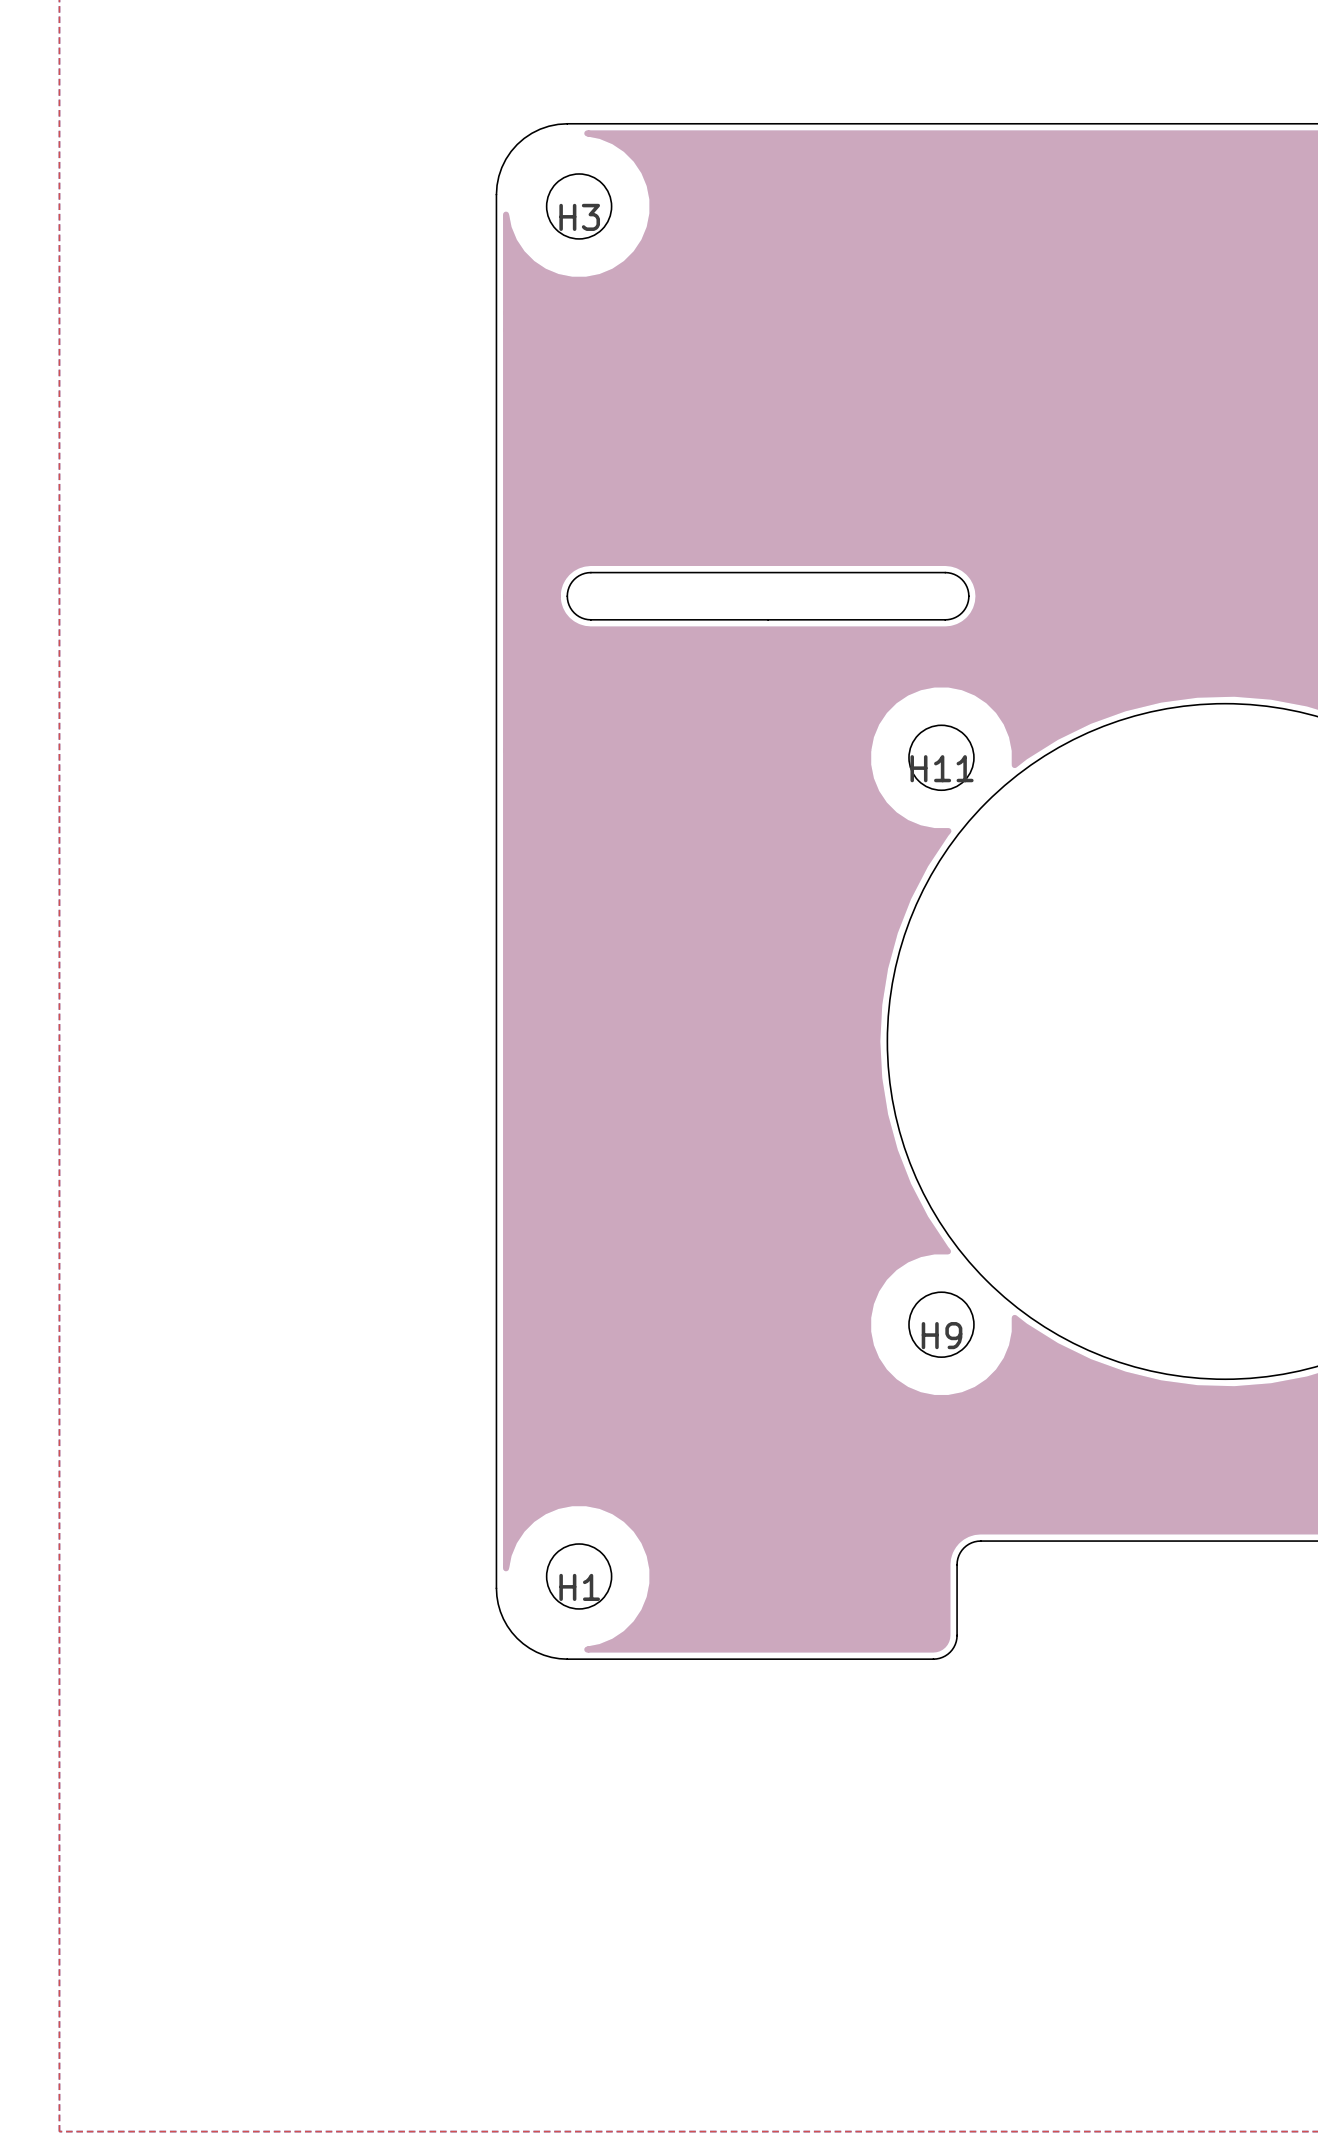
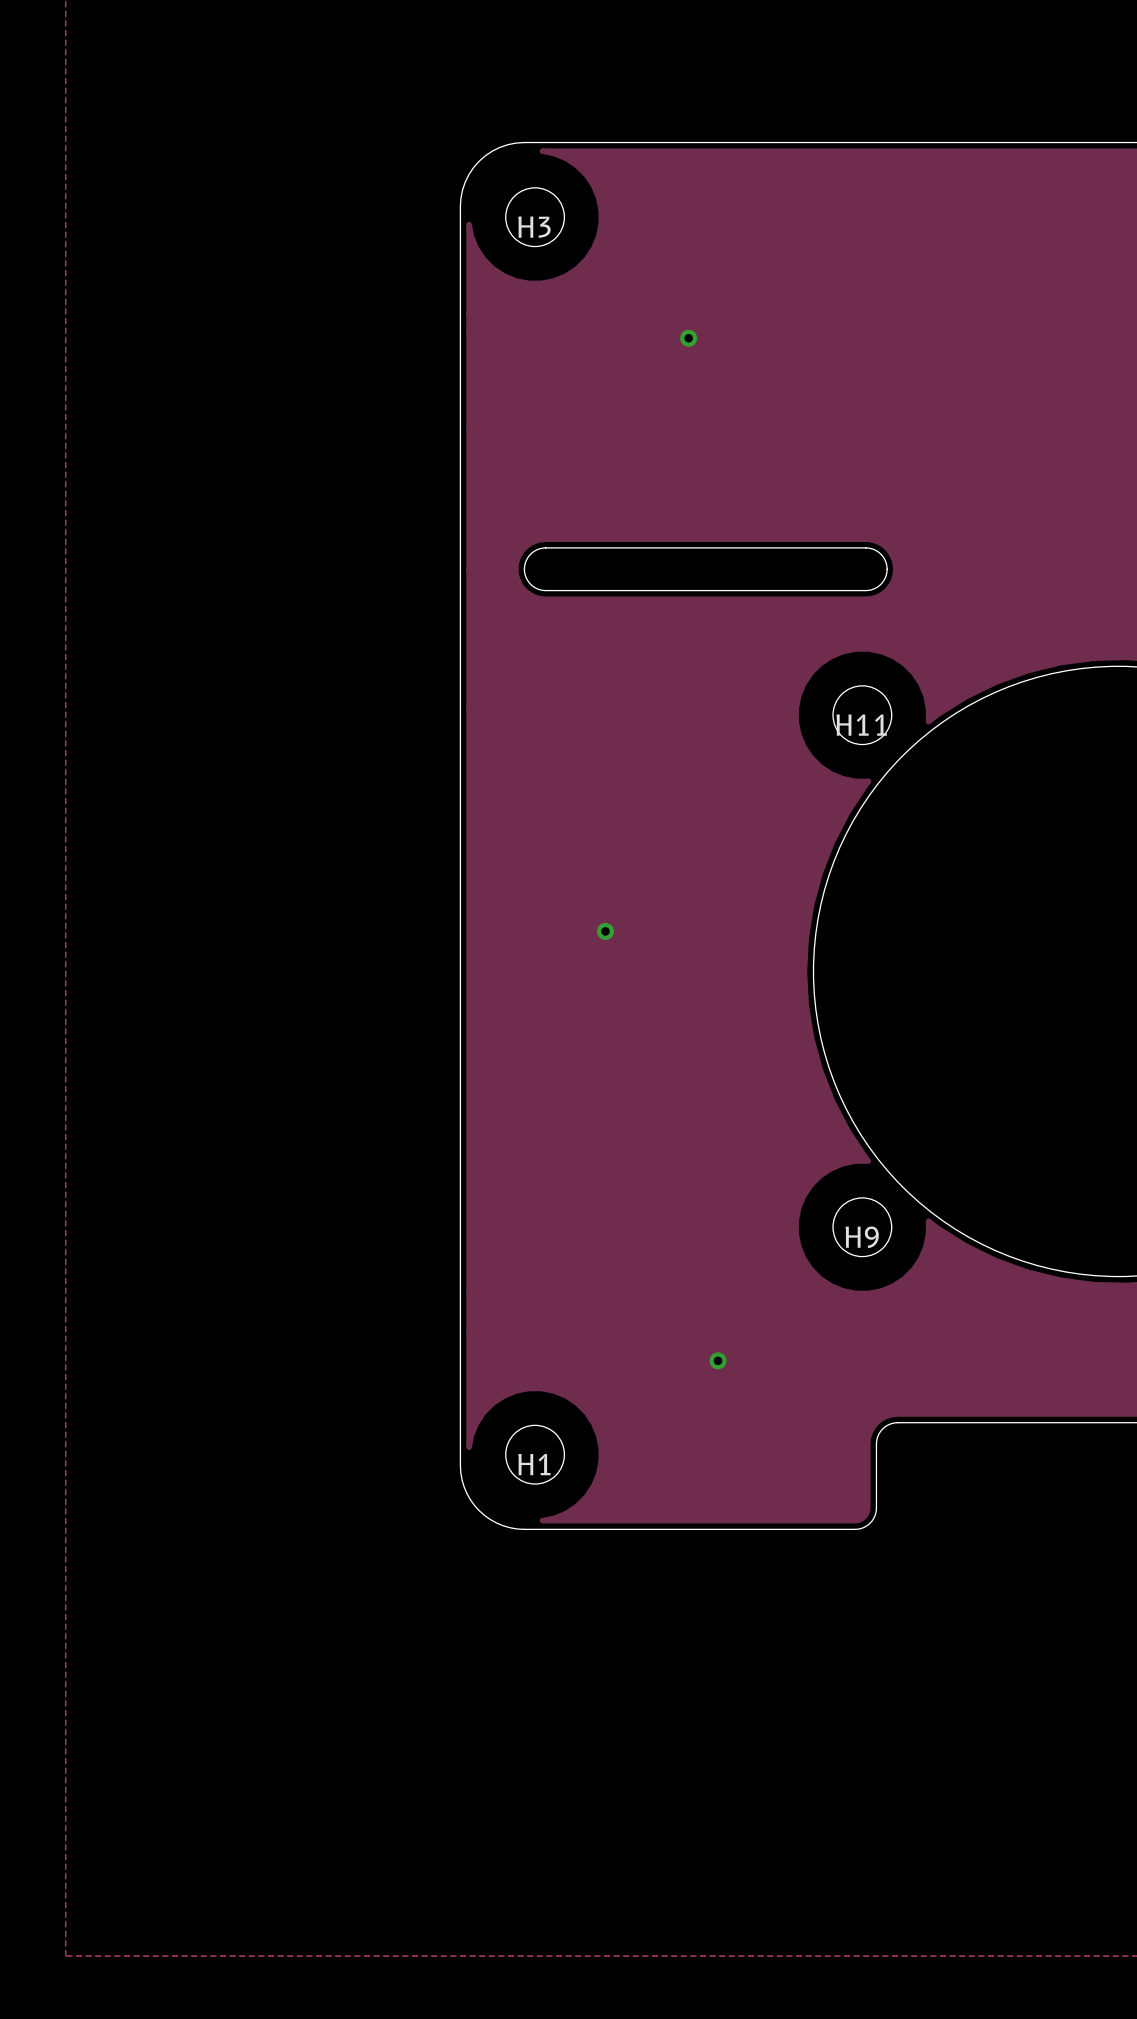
via: none -> (688, 338)
via: none -> (605, 931)
via: none -> (718, 1360)

